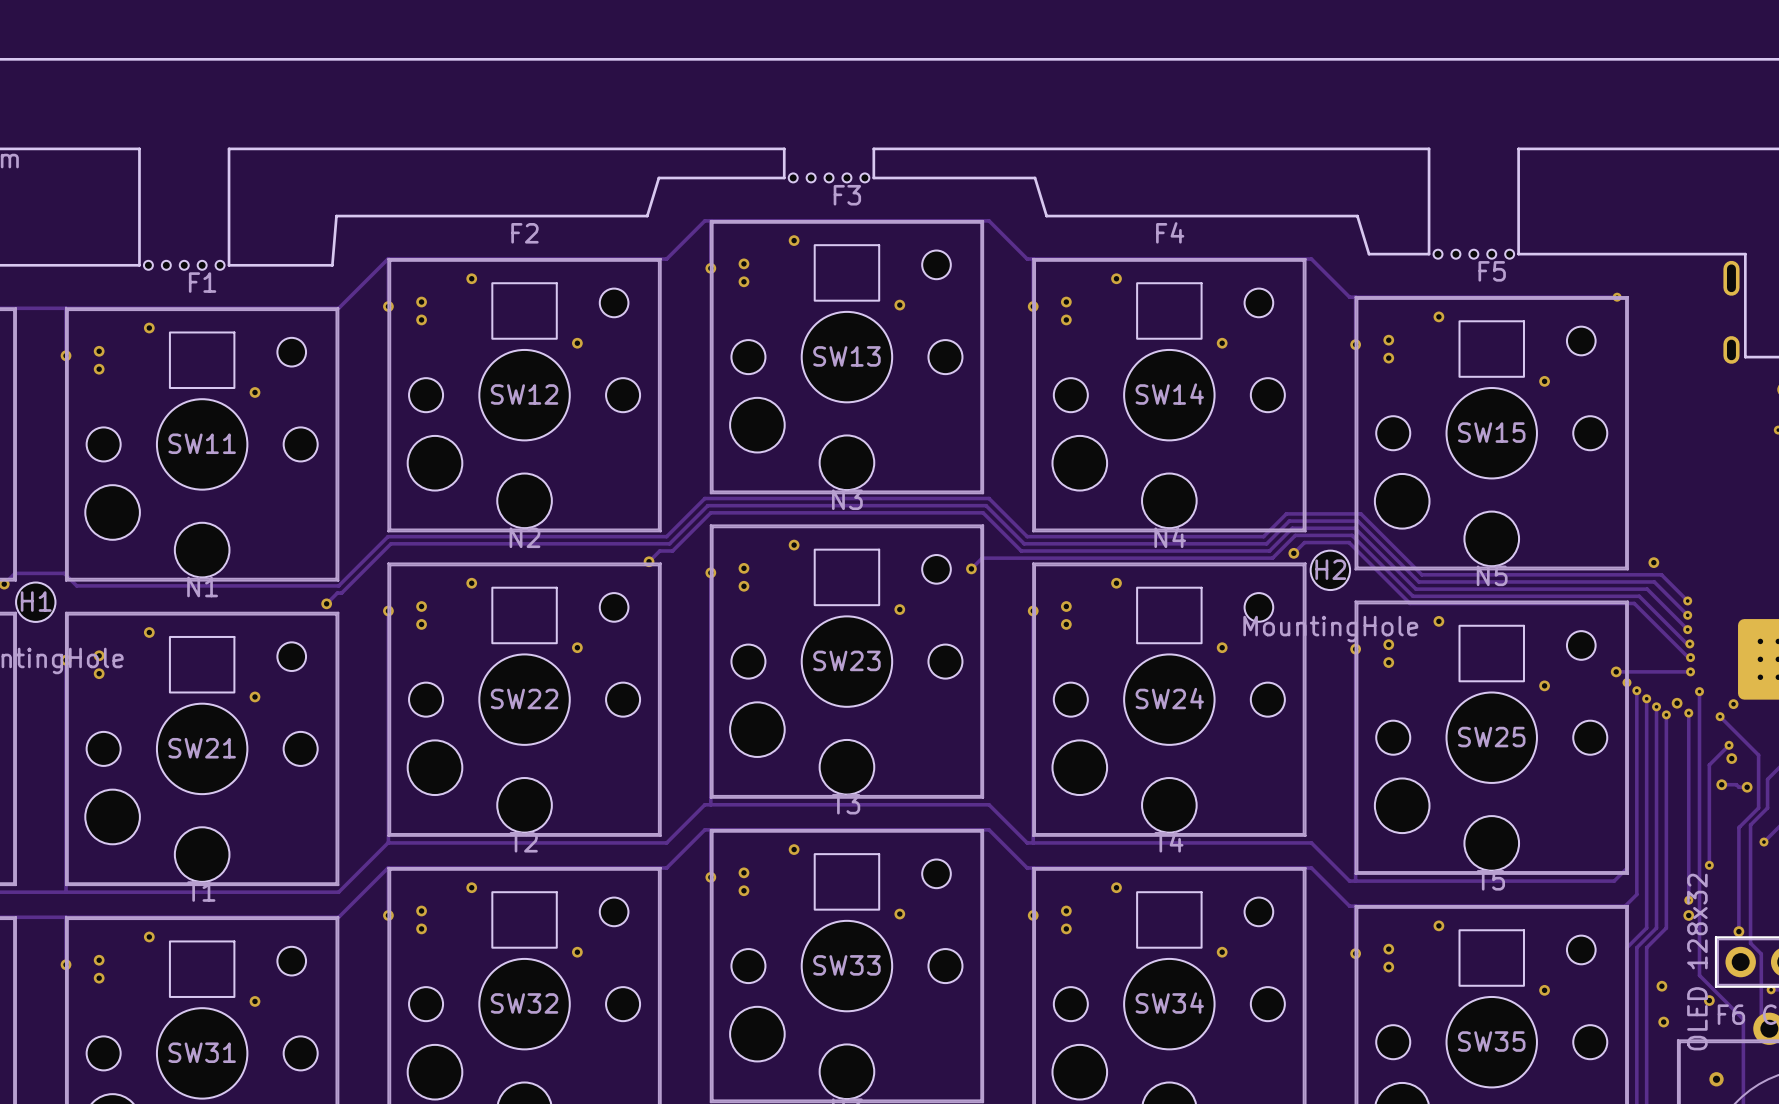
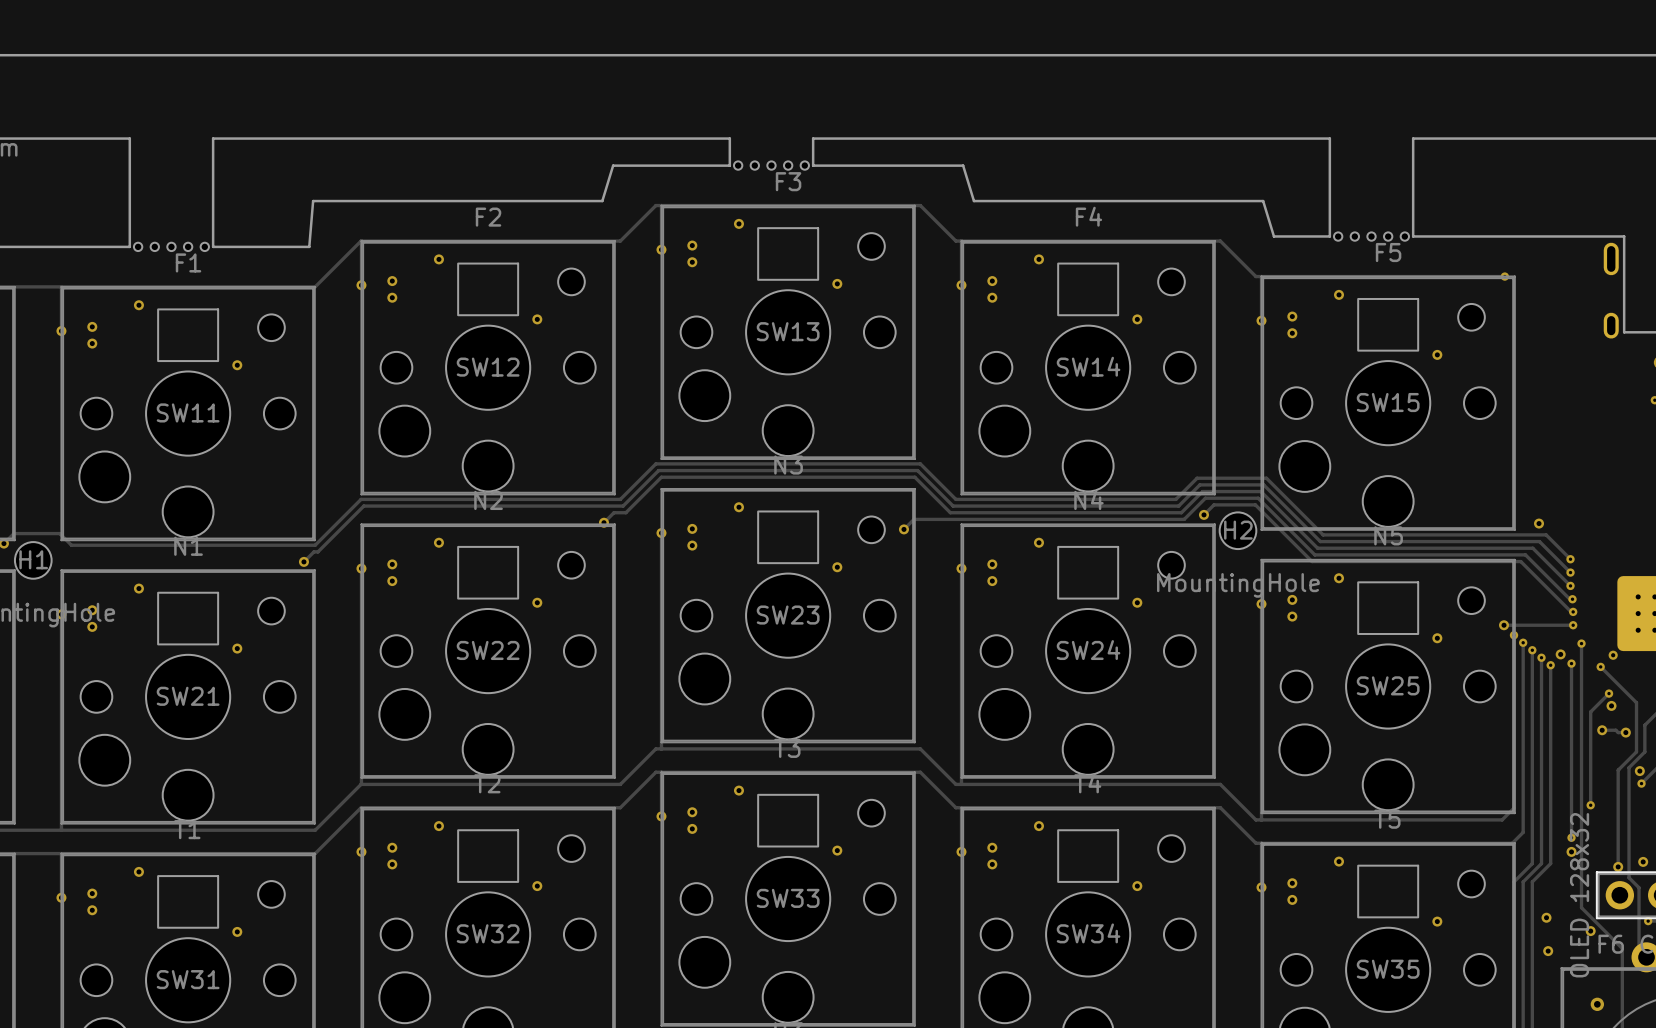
via: none -> (1639, 771)
via: none -> (1643, 861)

